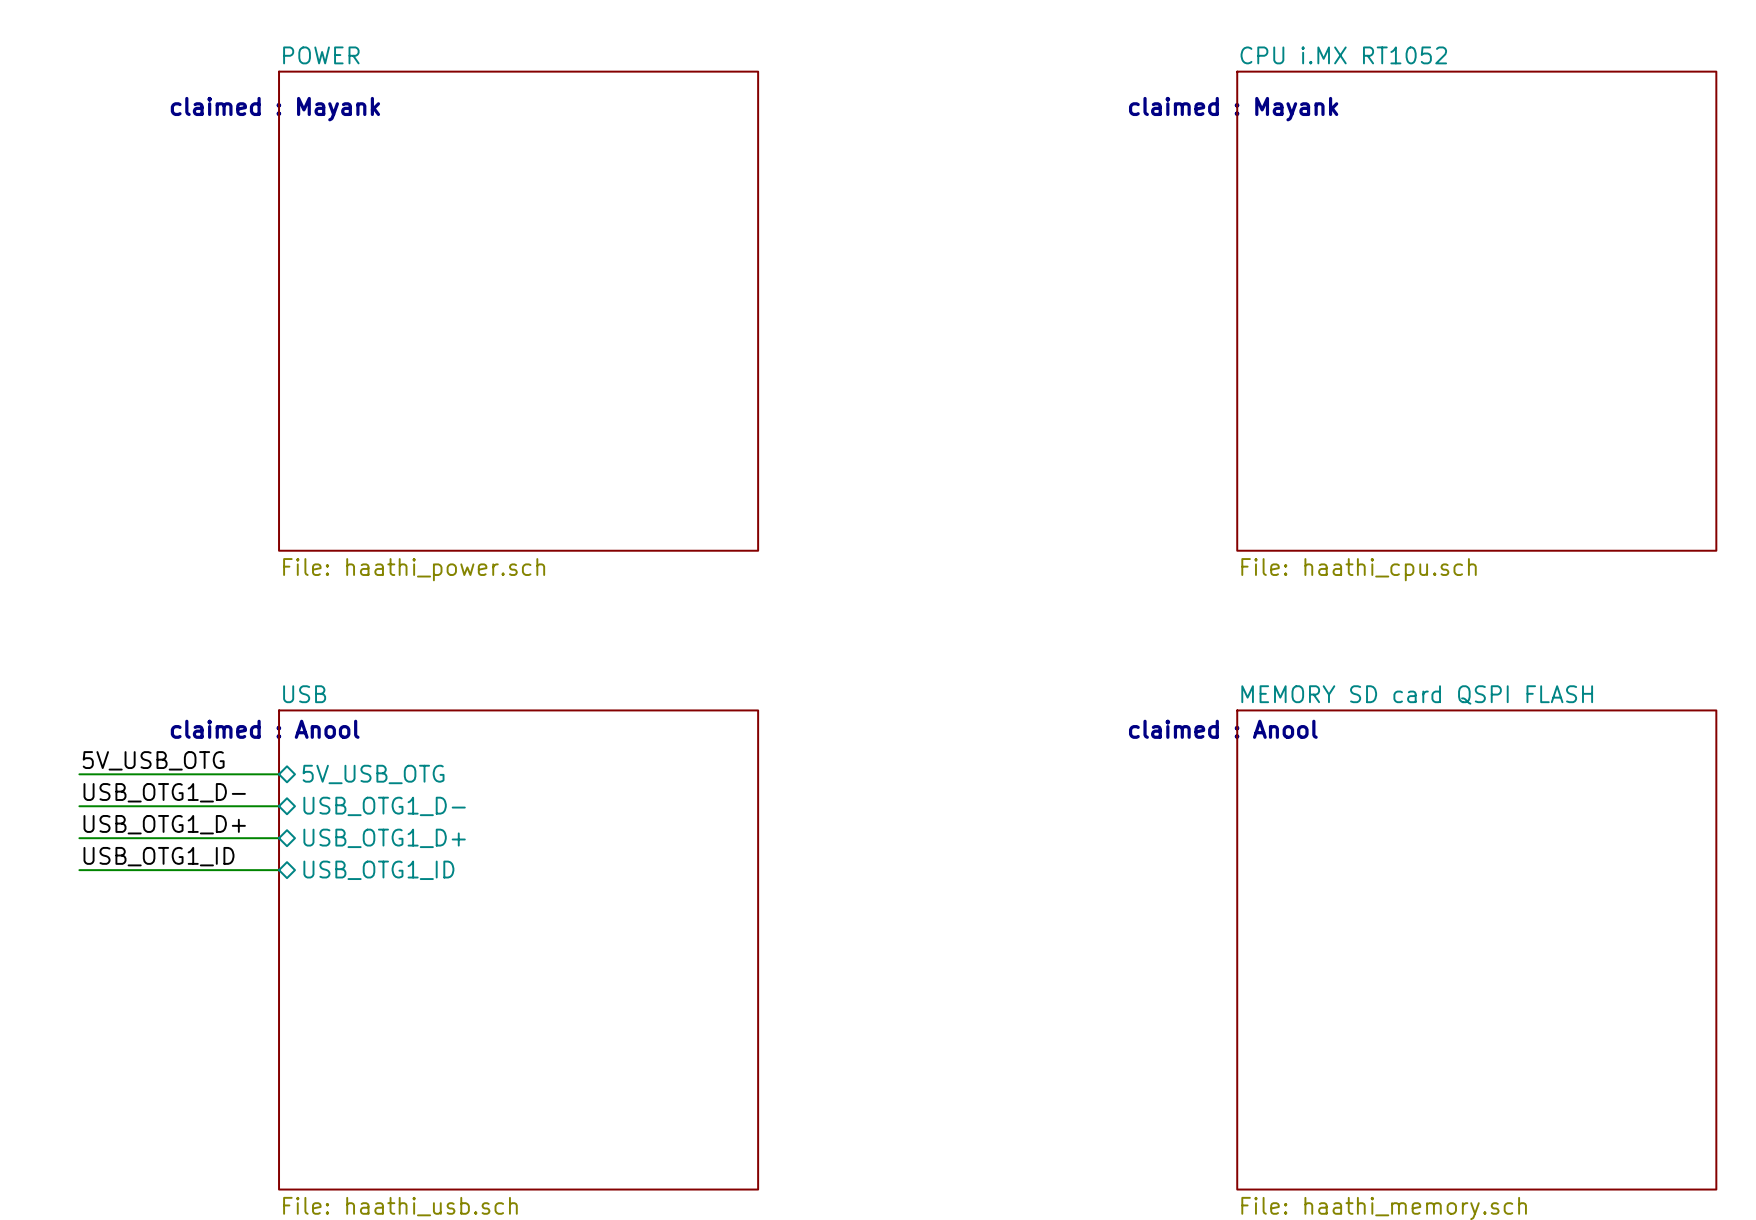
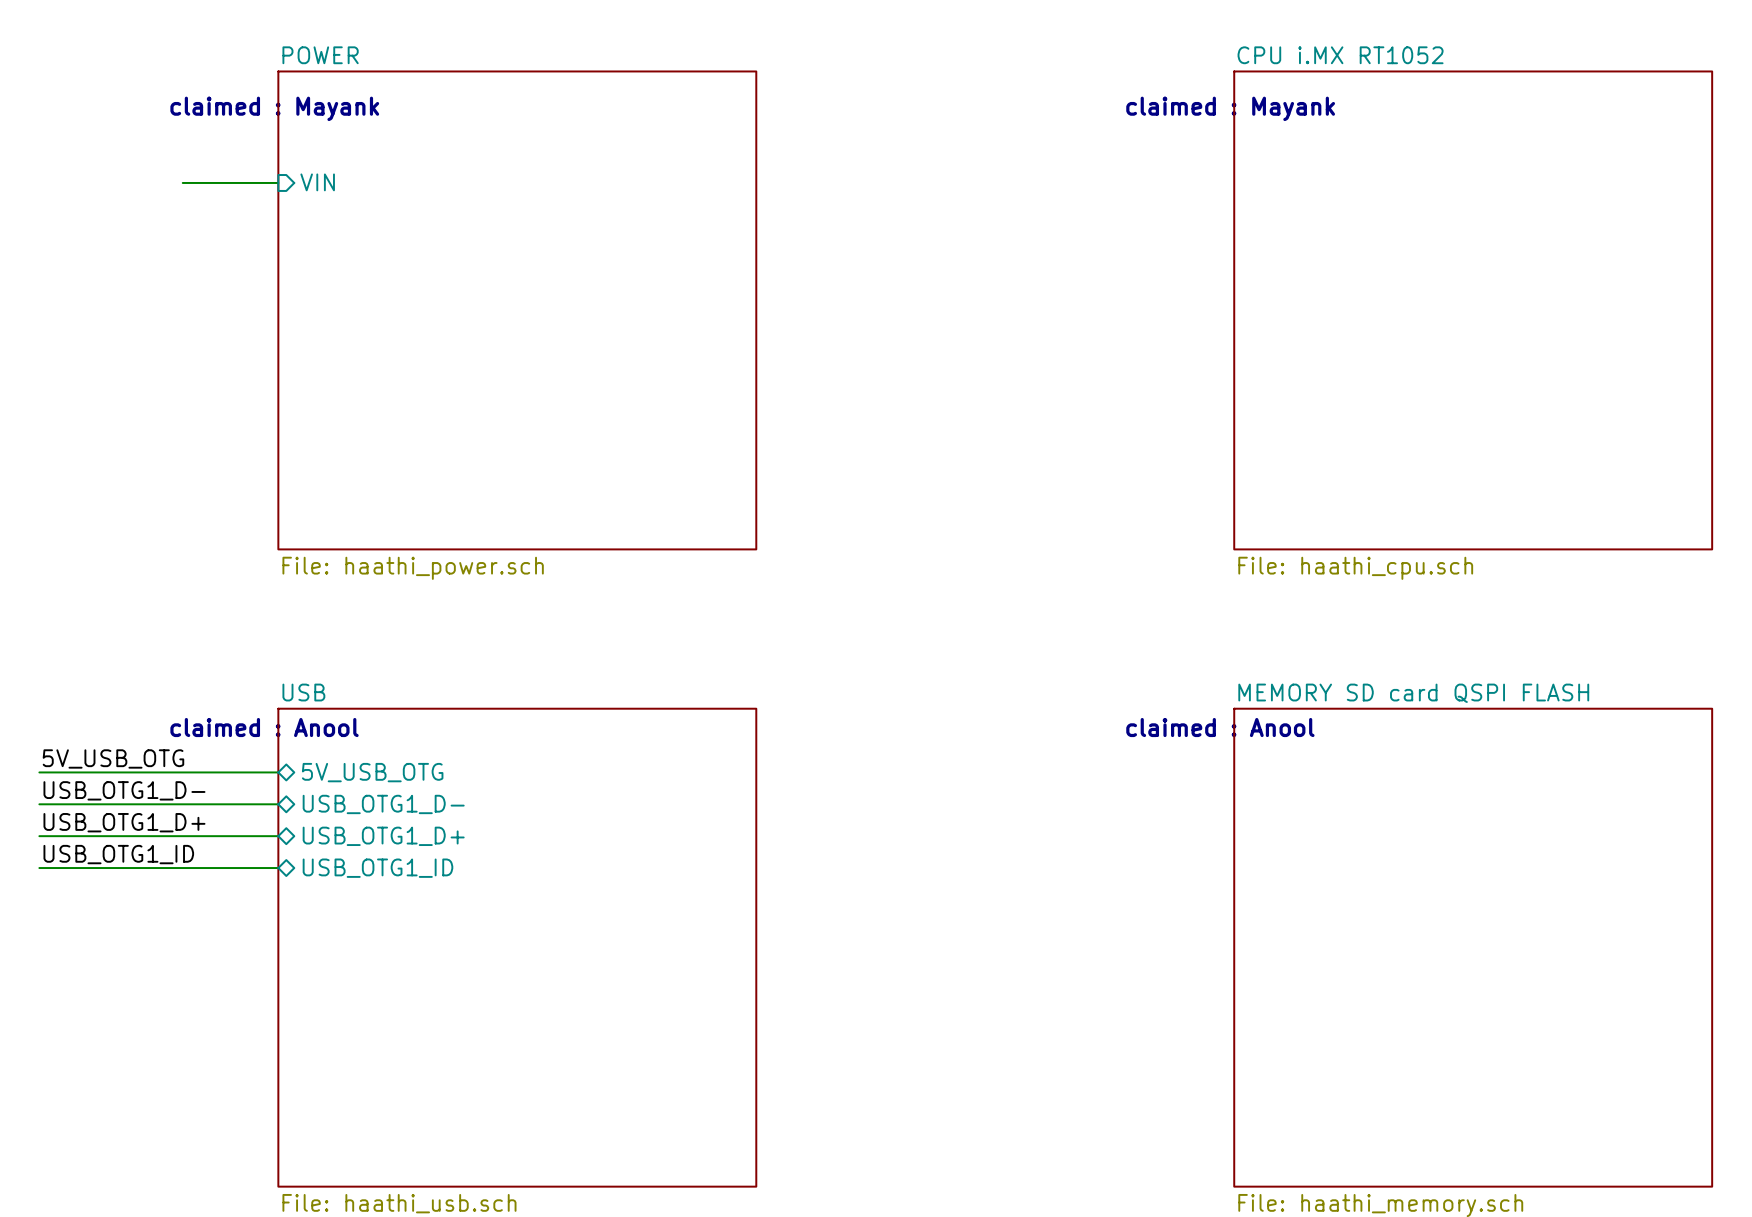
sheet pin: none -> VIN (317, 182)
wire: none -> (182, 182) (278, 182)
label position: 5V_USB_OTG (153, 760) -> 5V_USB_OTG (113, 758)
wire: none -> (39, 772) (79, 772)
label position: USB_OTG1_D- (164, 792) -> USB_OTG1_D- (124, 790)
wire: none -> (39, 804) (79, 804)
label position: USB_OTG1_D+ (164, 824) -> USB_OTG1_D+ (124, 822)
wire: none -> (39, 836) (79, 836)
label position: USB_OTG1_ID (158, 856) -> USB_OTG1_ID (118, 854)
wire: none -> (39, 868) (79, 868)

